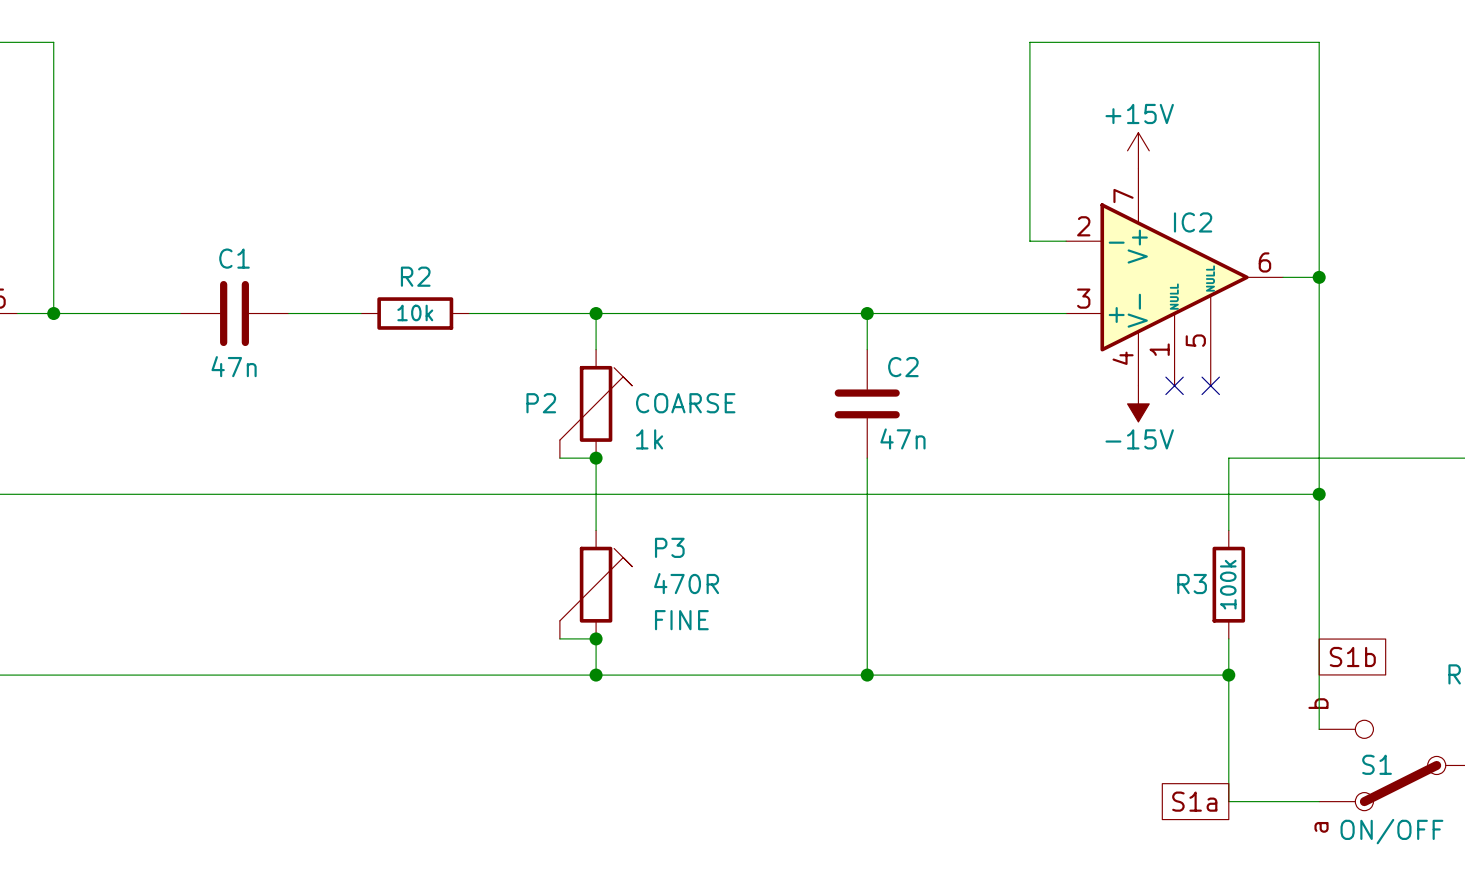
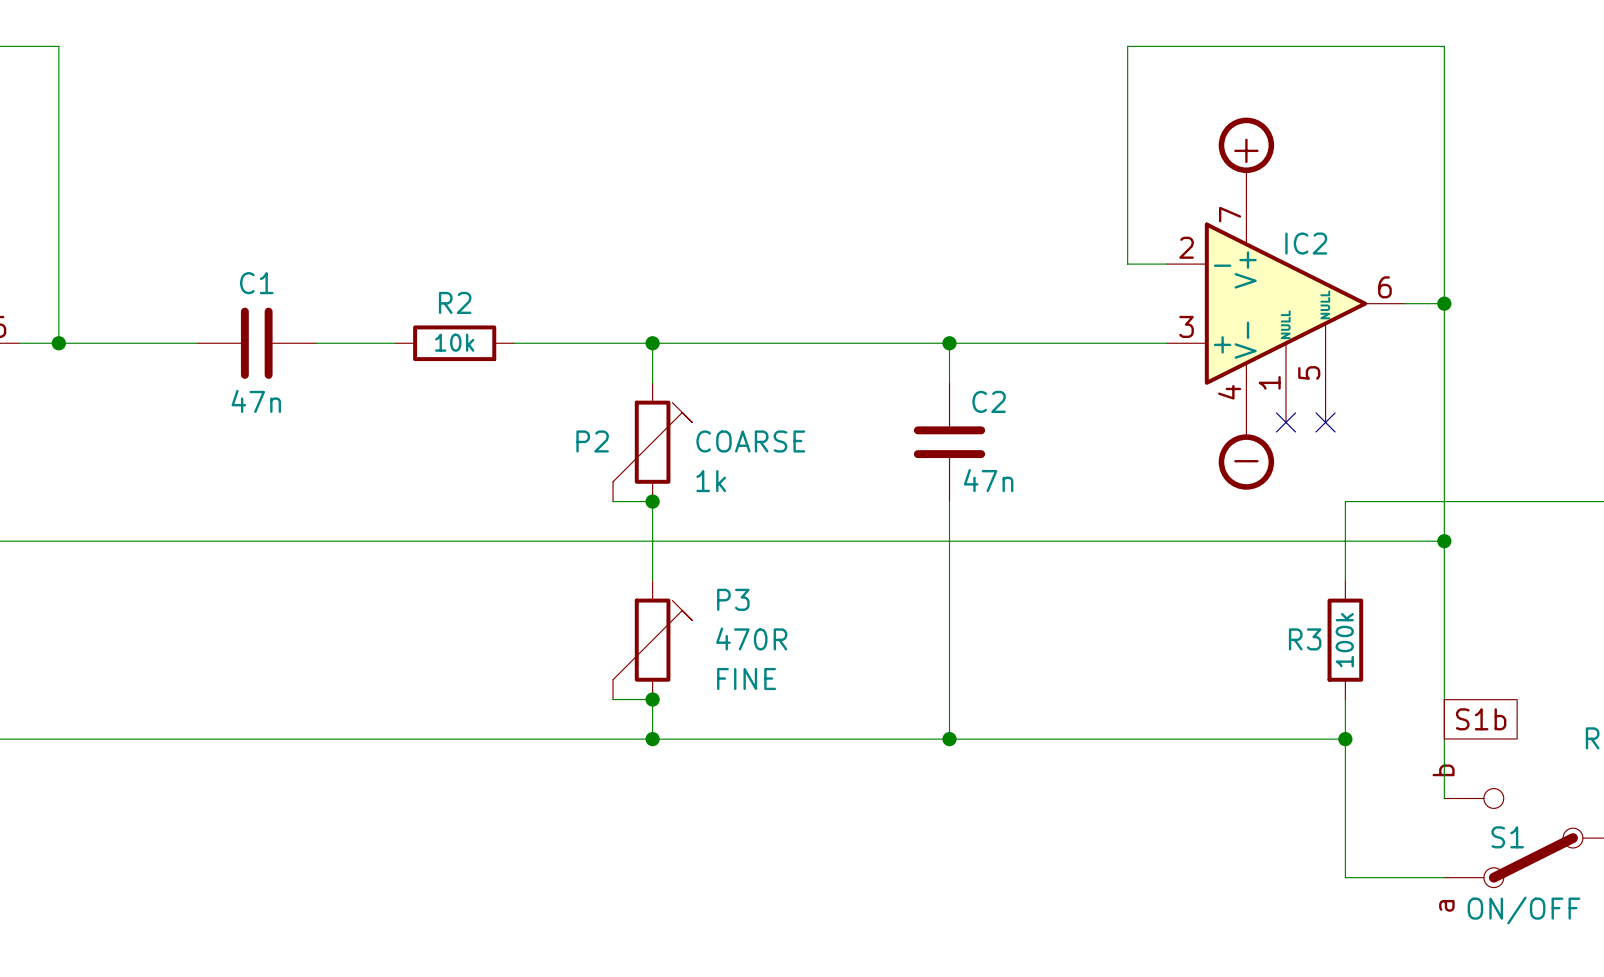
power symbol text: +15V (1139, 113) -> none
power symbol shape: [1127, 132, 1150, 169] -> [1218, 117, 1275, 185]
power symbol shape: [1127, 385, 1150, 422] -> [1218, 422, 1275, 490]
power symbol text: -15V (1139, 439) -> none
global label: S1a (1194, 801) -> none

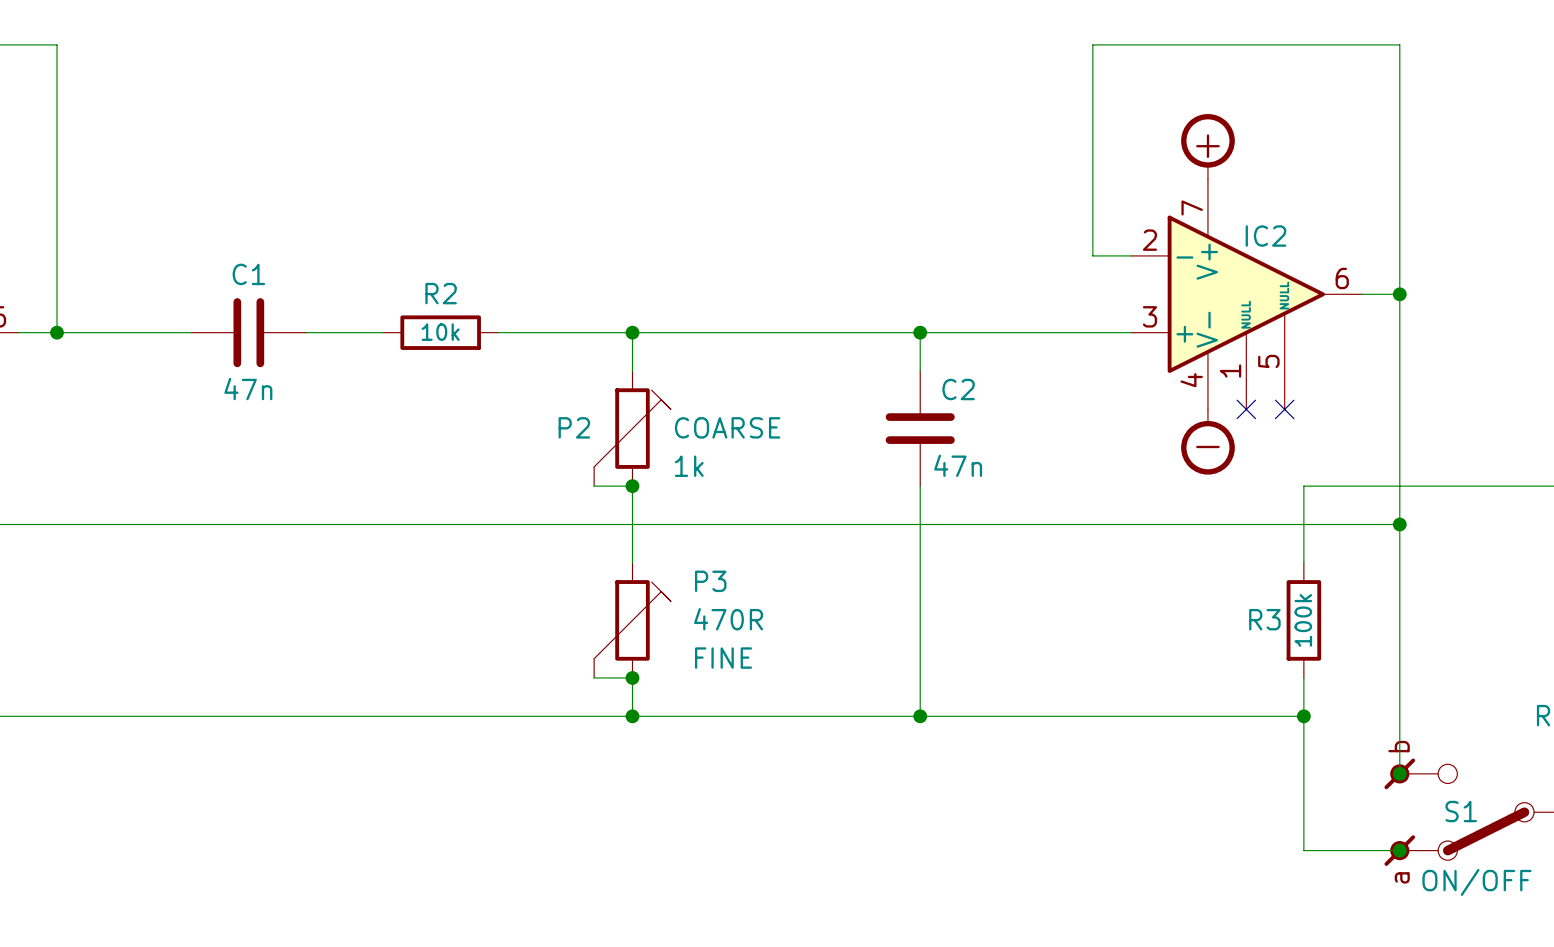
global label: S1b (1481, 719) -> none
junction: none -> (1399, 773)
part: none -> (1399, 773)
junction: none -> (1399, 850)
part: none -> (1399, 850)

